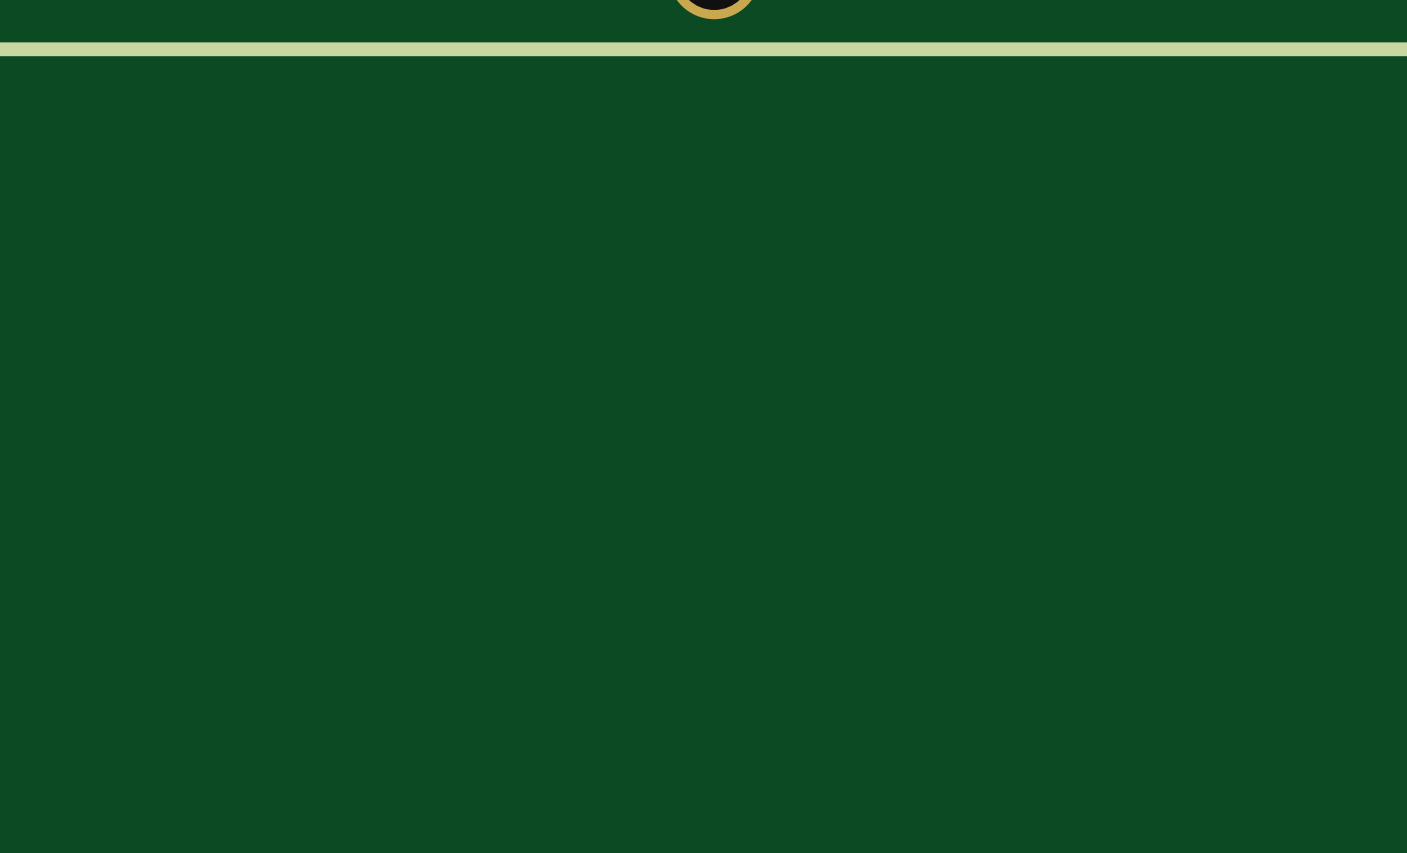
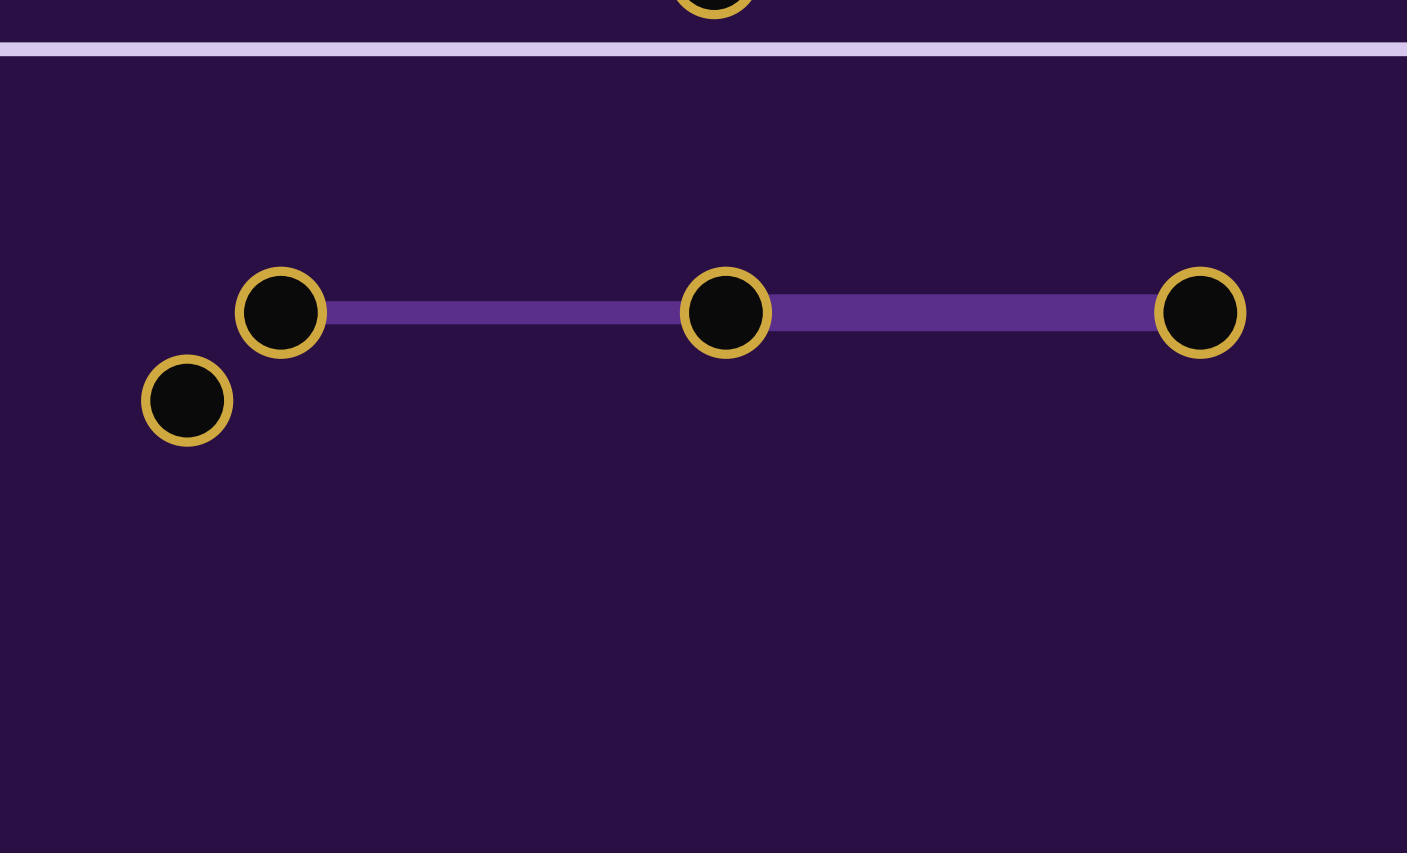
via: none -> (280, 312)
via: none -> (725, 312)
track: none -> (1200, 312) (280, 312)
via: none -> (1200, 312)
via: none -> (187, 400)

